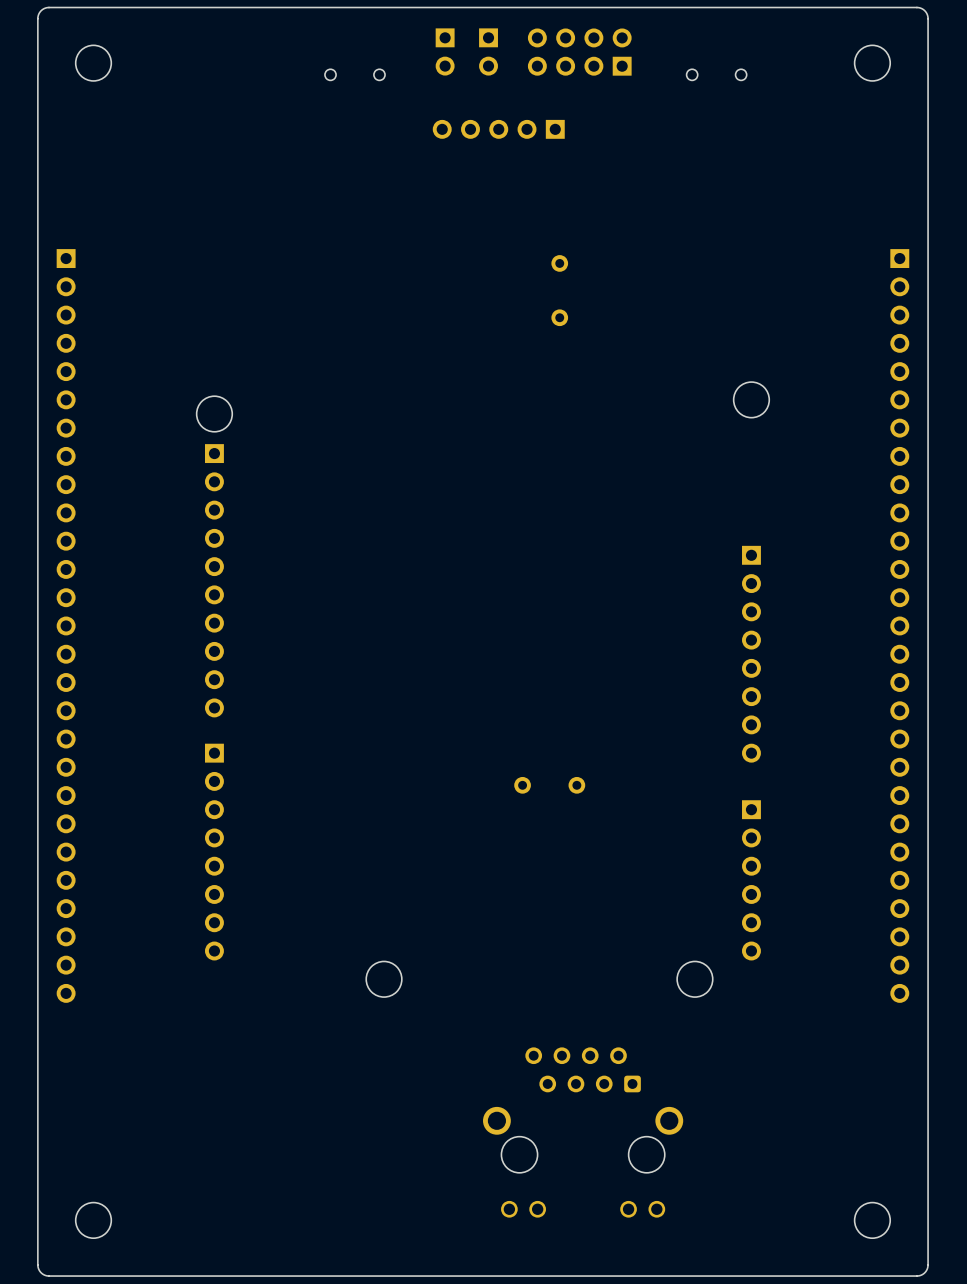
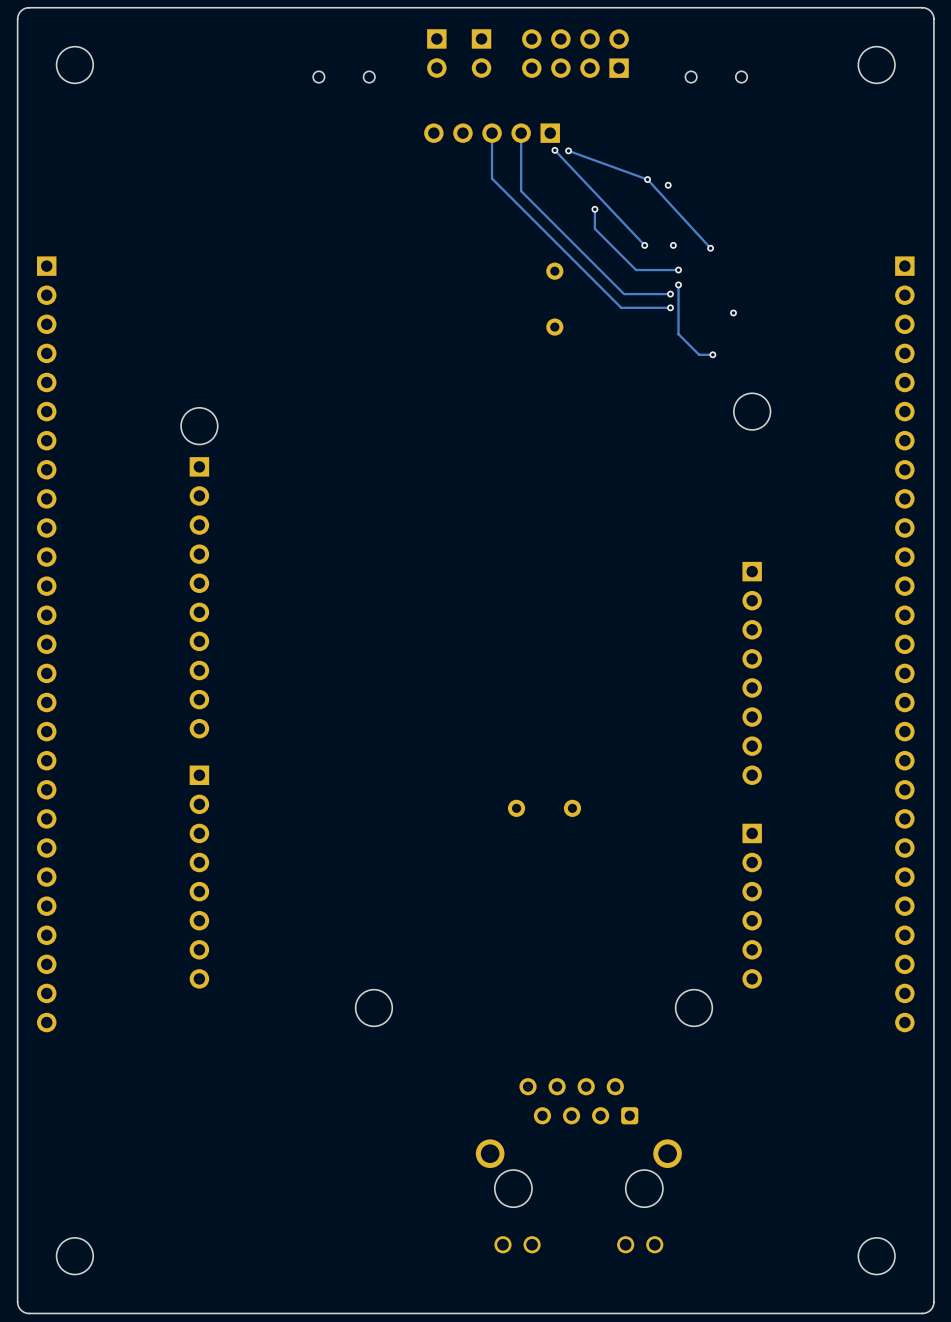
track: none -> (492, 133) (492, 178) (621, 307) (670, 307)
track: none -> (521, 133) (521, 191) (624, 294) (670, 294)
track: none -> (554, 150) (644, 245)
via: none -> (554, 150)
track: none -> (568, 150) (647, 179) (710, 248)
via: none -> (568, 150)
via: none -> (647, 179)
via: none -> (668, 185)
track: none -> (594, 209) (594, 228) (636, 270) (678, 270)
via: none -> (594, 209)
via: none -> (644, 245)
via: none -> (673, 245)
via: none -> (710, 248)
via: none -> (678, 270)
track: none -> (678, 284) (678, 334) (699, 354) (712, 354)
via: none -> (678, 284)
via: none -> (670, 294)
via: none -> (670, 307)
via: none -> (733, 312)
via: none -> (712, 354)

